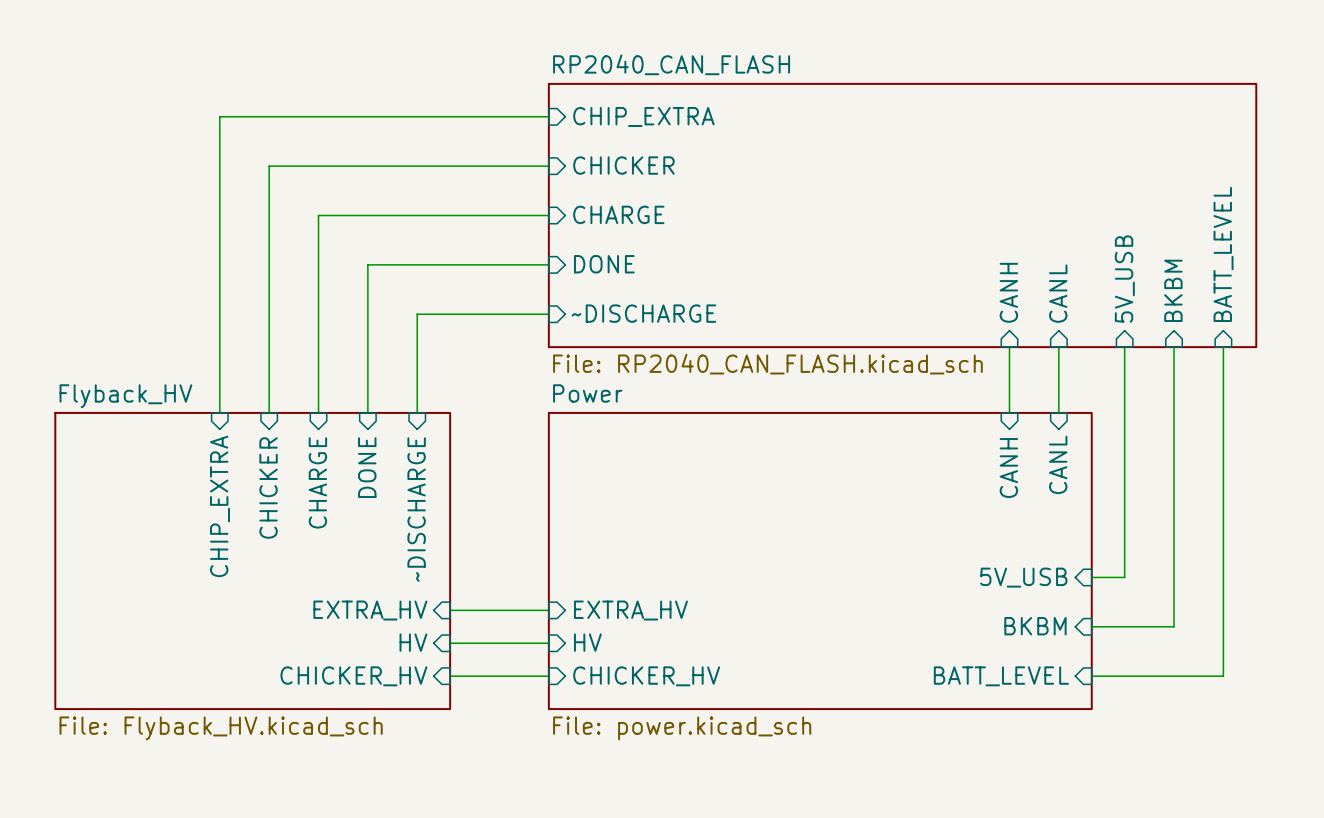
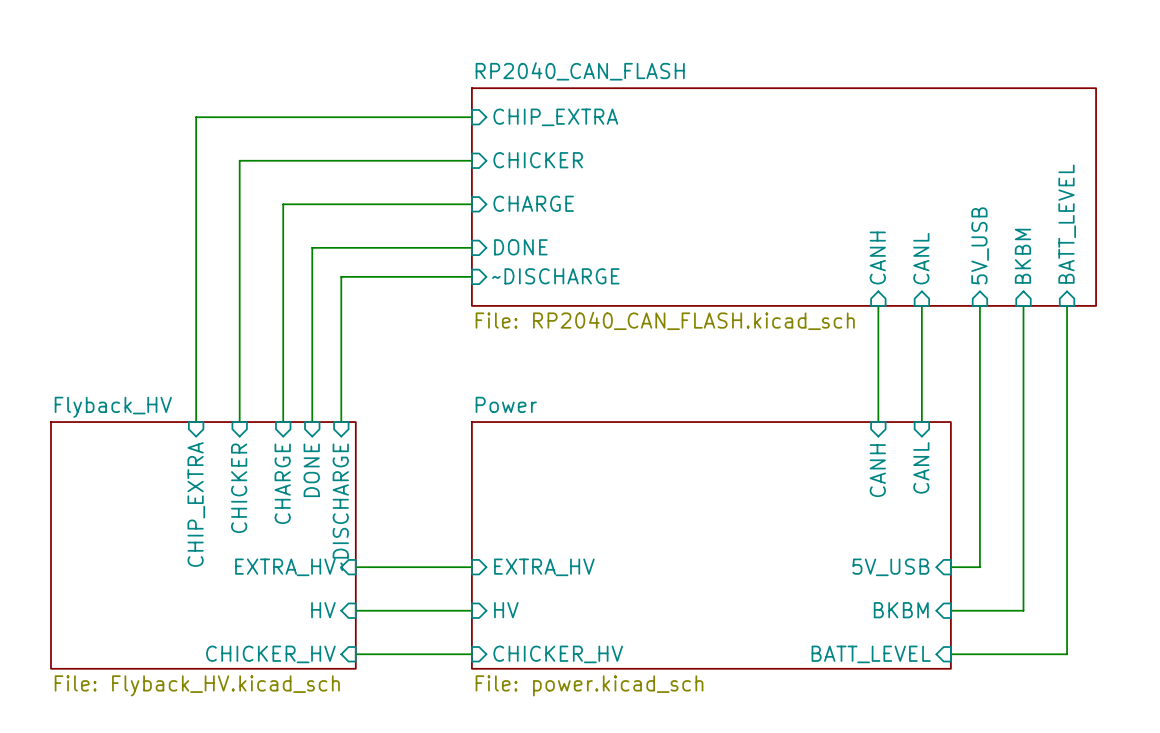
sheet RP2040_CAN_FLASH shape: [547, 82, 1258, 349] -> [471, 87, 1097, 307]
wire: (548, 116) (219, 116) (219, 412) -> none
sheet pin position: CHIP_EXTRA (643, 116) -> CHIP_EXTRA (555, 117)
wire: none -> (471, 117) (196, 117) (196, 422)
sheet pin position: CHICKER (623, 165) -> CHICKER (538, 160)
wire: (548, 166) (269, 166) (269, 412) -> none
wire: none -> (471, 160) (239, 160) (239, 422)
sheet pin position: CHARGE (618, 214) -> CHARGE (533, 203)
wire: (548, 215) (318, 215) (318, 412) -> none
wire: none -> (471, 204) (283, 204) (283, 422)
wire: (548, 264) (367, 264) (367, 281) -> (471, 247) (312, 247)
sheet pin position: DONE (604, 264) -> DONE (520, 247)
wire: (417, 314) (417, 412) -> (355, 276) (341, 276) (341, 422)
wire: none -> (312, 363) (312, 422)
wire: none -> (878, 363) (878, 422)
wire: none -> (921, 363) (921, 422)
sheet pin position: CANL (1058, 464) -> CANL (921, 467)
sheet pin position: DONE (367, 467) -> DONE (311, 470)
sheet pin position: CANH (1008, 468) -> CANH (877, 470)
sheet pin position: CHARGE (317, 482) -> CHARGE (282, 483)
sheet pin position: CHICKER (268, 488) -> CHICKER (239, 488)
sheet pin position: CHIP_EXTRA (219, 506) -> CHIP_EXTRA (196, 504)
sheet pin position: ~DISCHARGE (416, 509) -> ~DISCHARGE (340, 507)
sheet Flyback_HV: File: Flyback_HV.kicad_sch (252, 560) -> none
sheet Power: File: power.kicad_sch (820, 560) -> none
sheet pin position: 5V_USB (1023, 577) -> 5V_USB (890, 567)
wire: (1091, 577) (1124, 577) -> (950, 567) (979, 567) (979, 509)
sheet pin position: EXTRA_HV (370, 610) -> EXTRA_HV (285, 567)
wire: (450, 610) (548, 610) -> none
sheet pin: EXTRA_HV (630, 610) -> none
sheet Flyback_HV: none -> File: Flyback_HV.kicad_sch (203, 545)
sheet Power: none -> File: power.kicad_sch (711, 545)
sheet pin position: BKBM (1035, 626) -> BKBM (901, 610)
wire: (1091, 626) (1174, 626) -> (950, 610) (1023, 610) (1023, 552)
sheet pin position: HV (413, 642) -> HV (323, 610)
sheet pin: HV (587, 642) -> EXTRA_HV (544, 567)
wire: none -> (355, 567) (384, 567)
sheet pin position: CHICKER_HV (353, 676) -> CHICKER_HV (270, 654)
wire: (450, 676) (548, 676) -> none
sheet pin position: CHICKER_HV (646, 676) -> CHICKER_HV (558, 654)
sheet pin position: BATT_LEVEL (1001, 676) -> BATT_LEVEL (871, 654)
wire: (1091, 676) (1223, 676) -> (950, 654) (1067, 654) (1067, 596)
sheet pin: none -> HV (506, 610)
wire: none -> (355, 610) (471, 610)
wire: none -> (355, 654) (471, 654)

